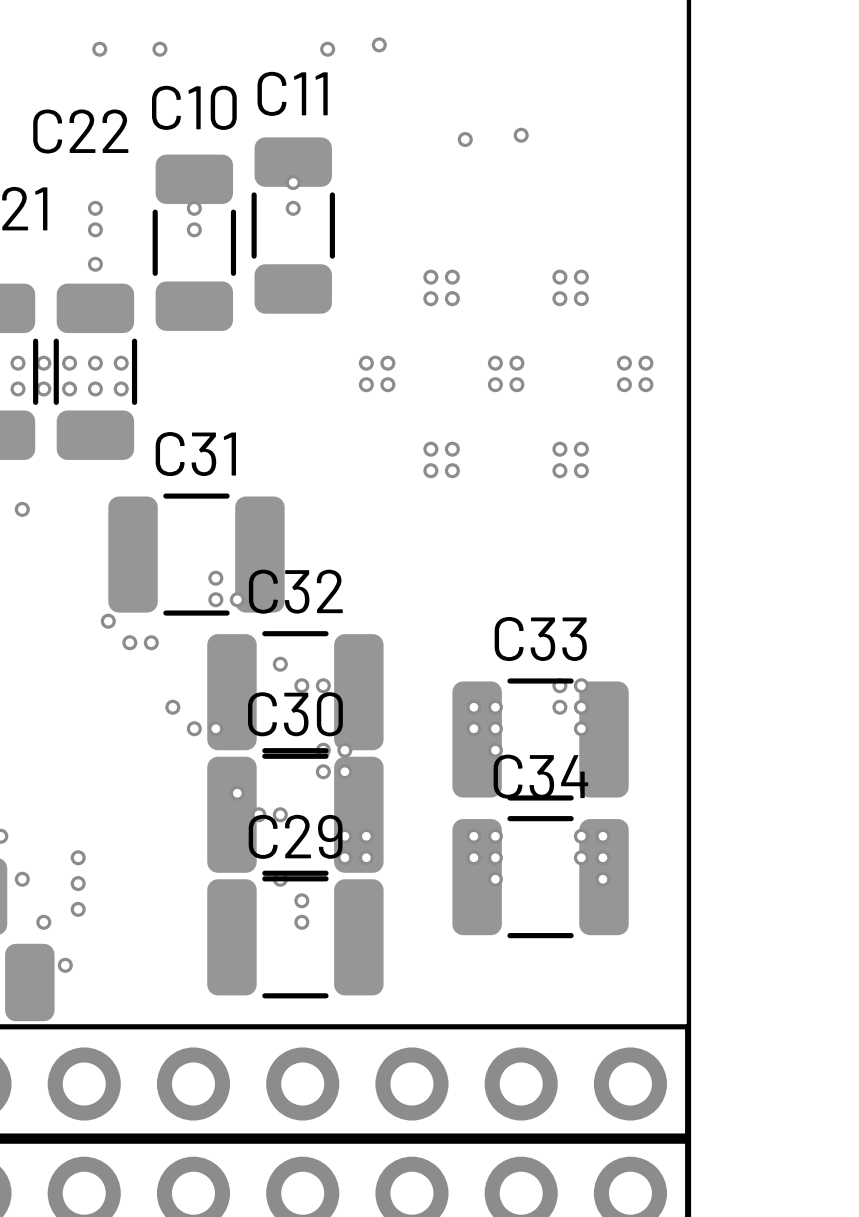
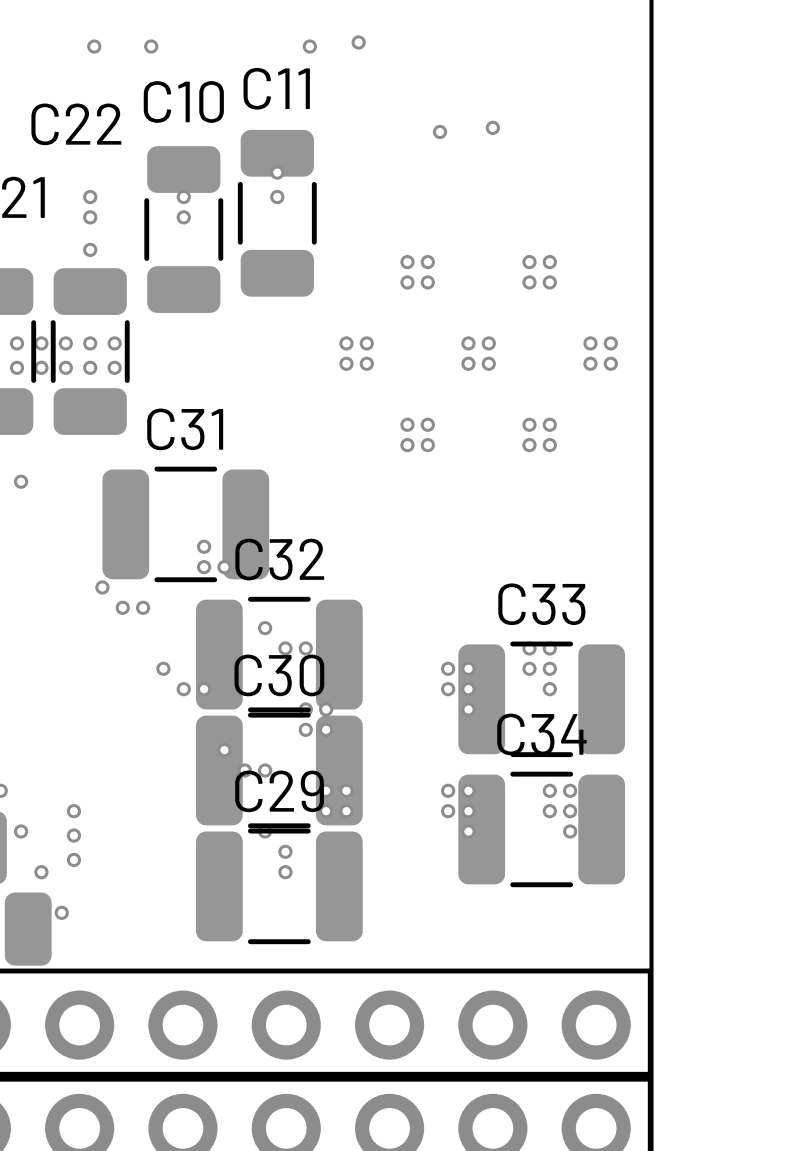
C33 position: (540, 739) -> (541, 699)
C34 position: (540, 877) -> (541, 829)

